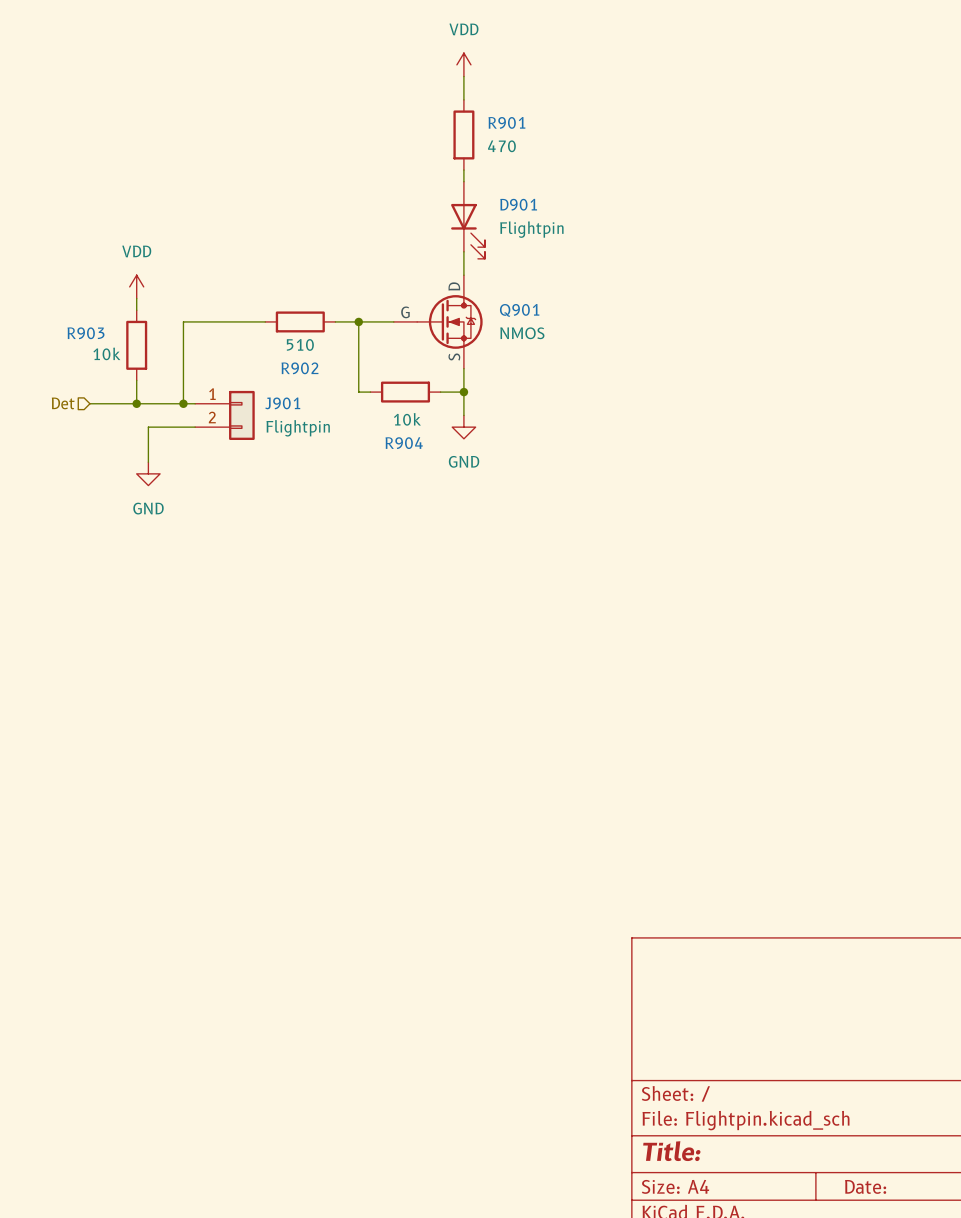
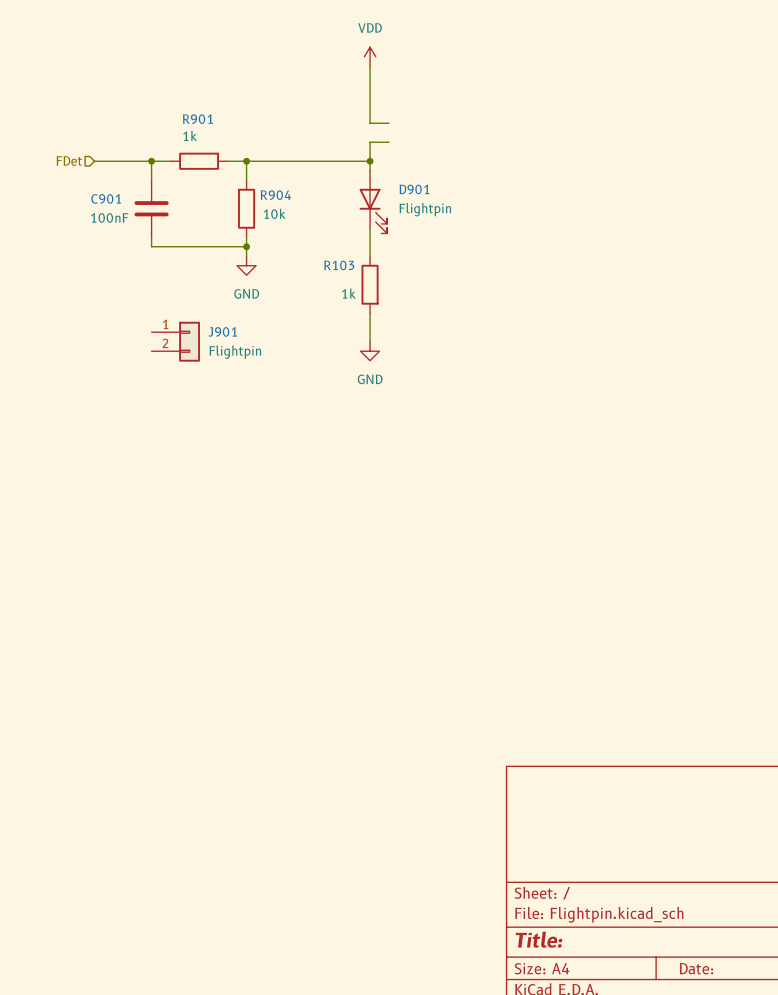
wire: none -> (370, 85) (370, 123) (389, 123)
R901 name position: R901 (506, 122) -> R901 (197, 119)
R901 rotation: 0° (463, 134) -> 90° clockwise (199, 161)
R901 position: (463, 134) -> (199, 161)
R901 value: 470 (501, 146) -> 1k (190, 135)
hierarchical label: none -> FDet (69, 160)
wire: none -> (94, 161) (170, 161)
junction: none -> (151, 161)
wire: none -> (227, 161) (370, 161)
wire: none -> (246, 161) (246, 180)
junction: none -> (246, 161)
junction: none -> (370, 161)
D901 position: (468, 220) -> (373, 202)
C901: none -> 100nF (151, 208)
power symbol: VDD (136, 286) -> none
wire: none -> (151, 237) (151, 246) (246, 246)
wire: none -> (246, 237) (246, 256)
wire: (136, 298) (136, 310) -> none
wire: (265, 321) (183, 321) (183, 403) -> none
R902: 510 (300, 321) -> none
wire: (335, 321) (393, 321) -> none
wire: (358, 321) (358, 392) (370, 392) -> none
junction position: (358, 321) -> (246, 246)
Q901: NMOS (438, 321) -> none
R903: 10k (136, 345) -> none
R103: none -> 1k (370, 284)
wire: (136, 380) (136, 403) -> (151, 161) (151, 180)
R904 rotation: 0° (405, 392) -> 90° clockwise (246, 208)
R904 position: (405, 392) -> (246, 208)
wire: (440, 392) (463, 392) -> (370, 142) (389, 142)
junction: (463, 392) -> none
hierarchical label: Det (63, 403) -> none
wire: (89, 403) (195, 403) -> none
junction: (136, 403) -> none
junction: (183, 403) -> none
R904 value position: 10k (407, 419) -> 10k (274, 213)
wire: (195, 427) (148, 427) (148, 462) -> none
R904 name position: R904 (404, 443) -> R904 (275, 195)
power symbol position: GND (148, 473) -> GND (246, 265)

